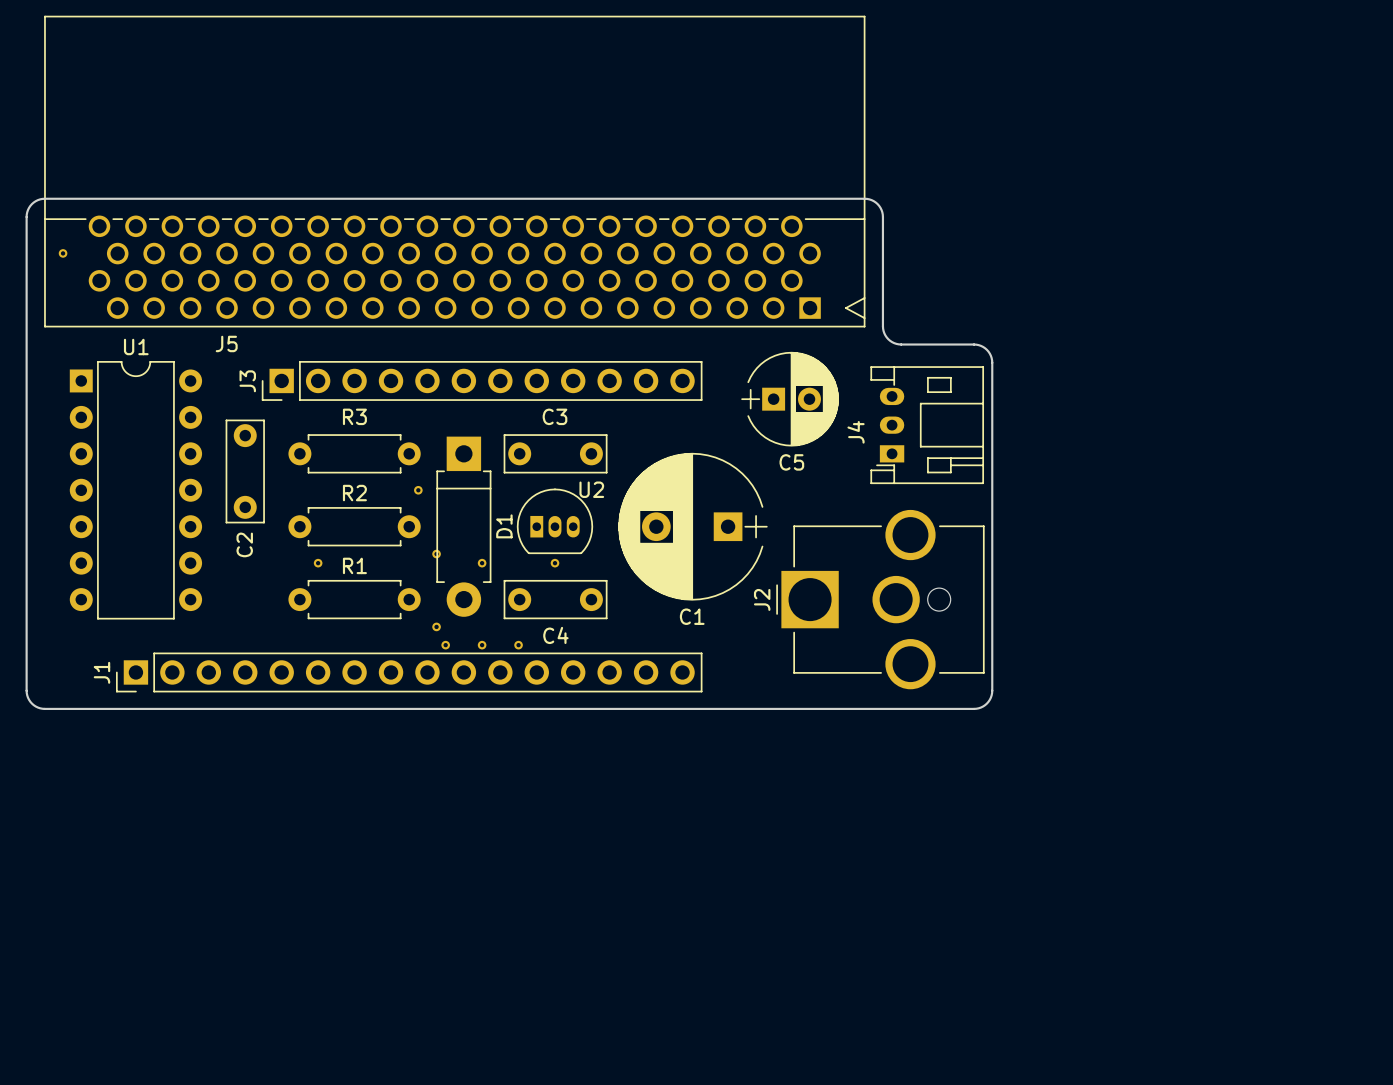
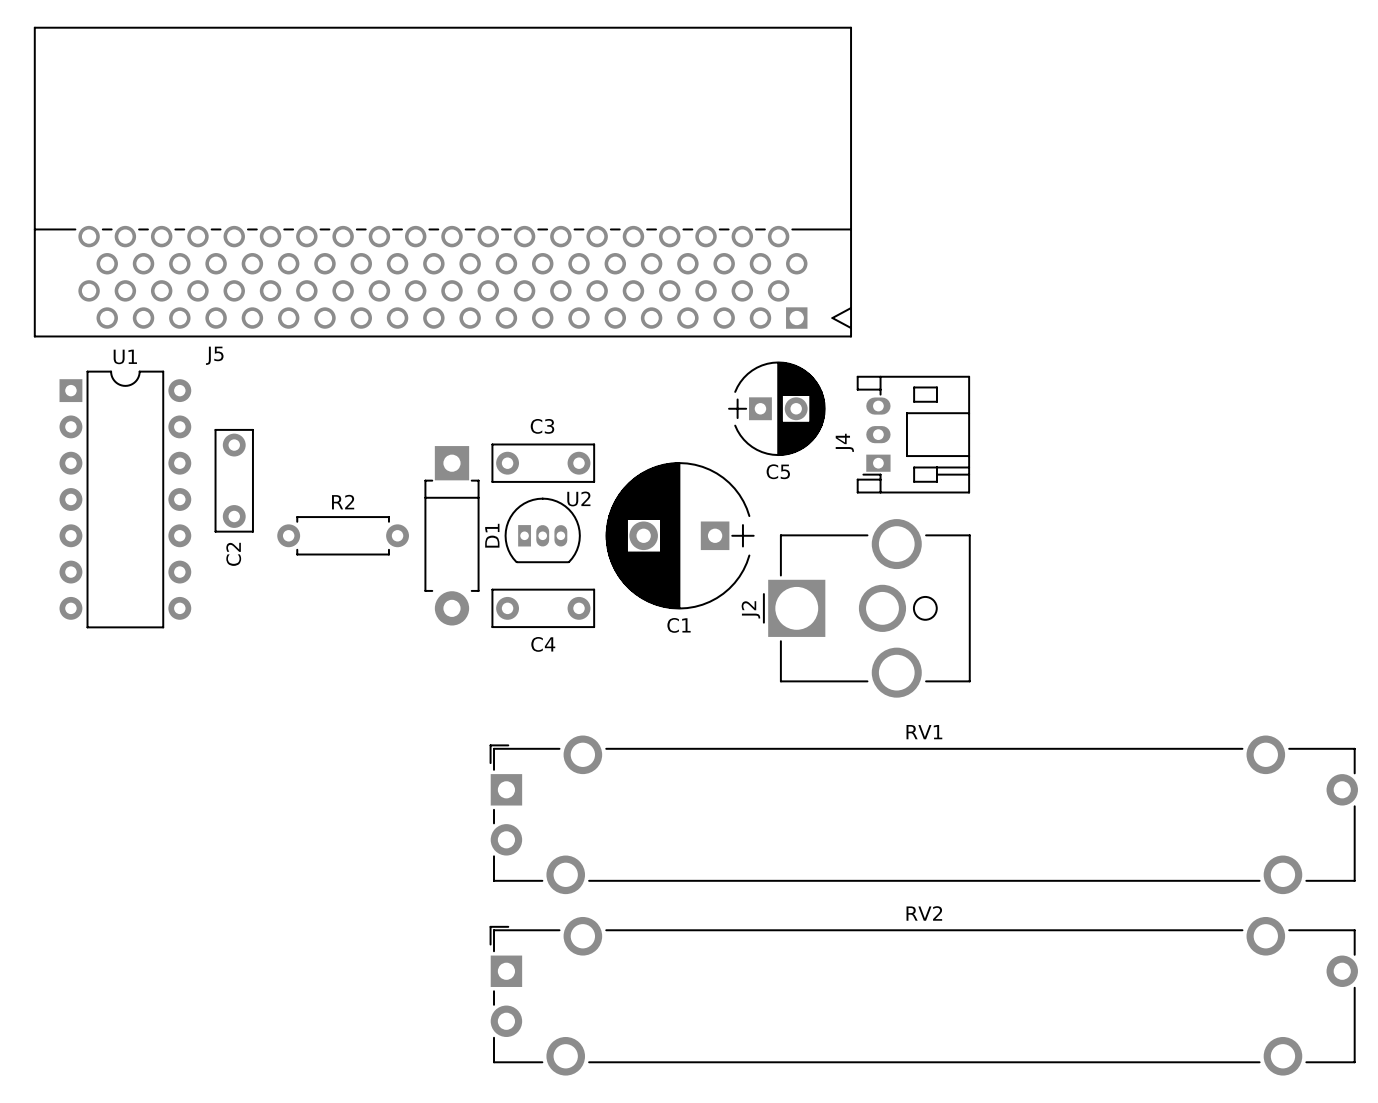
board edge: (44, 198) (864, 198) (873, 201) (880, 207) (882, 214) (882, 326) (886, 337) (898, 344) (976, 344) (986, 349) (991, 358) (992, 690) (989, 699) (983, 706) (974, 708) (44, 708) (35, 706) (29, 699) (26, 690) (26, 216) (31, 204) (44, 198) -> none
part: (63, 253) -> none
J3: (482, 380) -> none
R3: (354, 453) -> none
part: (418, 490) -> none
part: (436, 554) -> none
part: (318, 563) -> none
part: (482, 563) -> none
part: (554, 563) -> none
R1: (354, 599) -> none
part: (436, 626) -> none
part: (445, 645) -> none
part: (482, 645) -> none
part: (518, 645) -> none
J1: (409, 672) -> none
RV1: none -> (923, 814)
RV2: none -> (923, 996)

